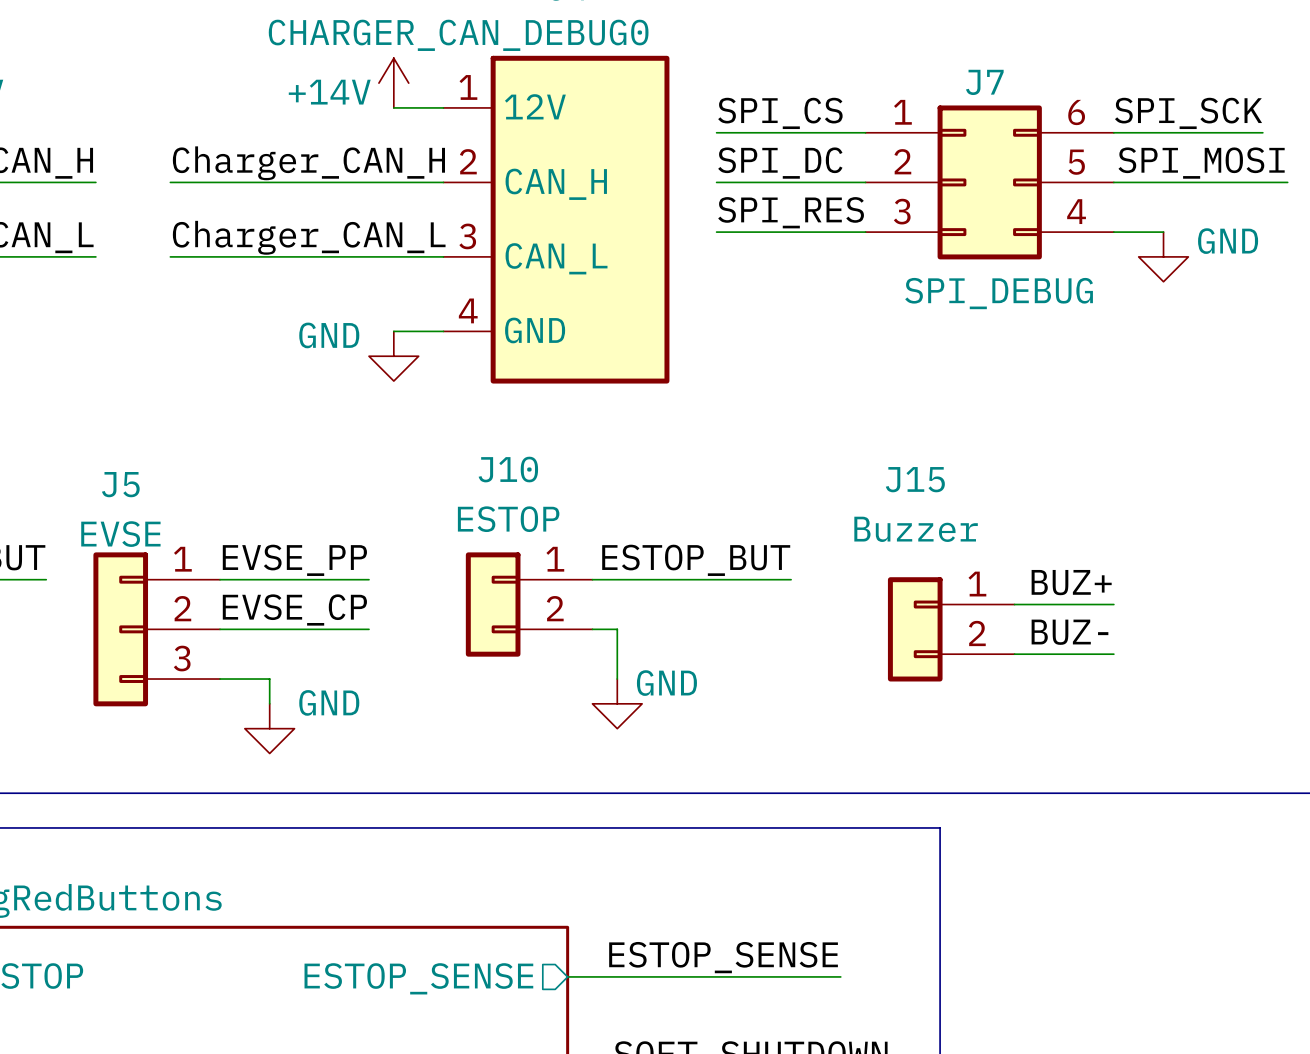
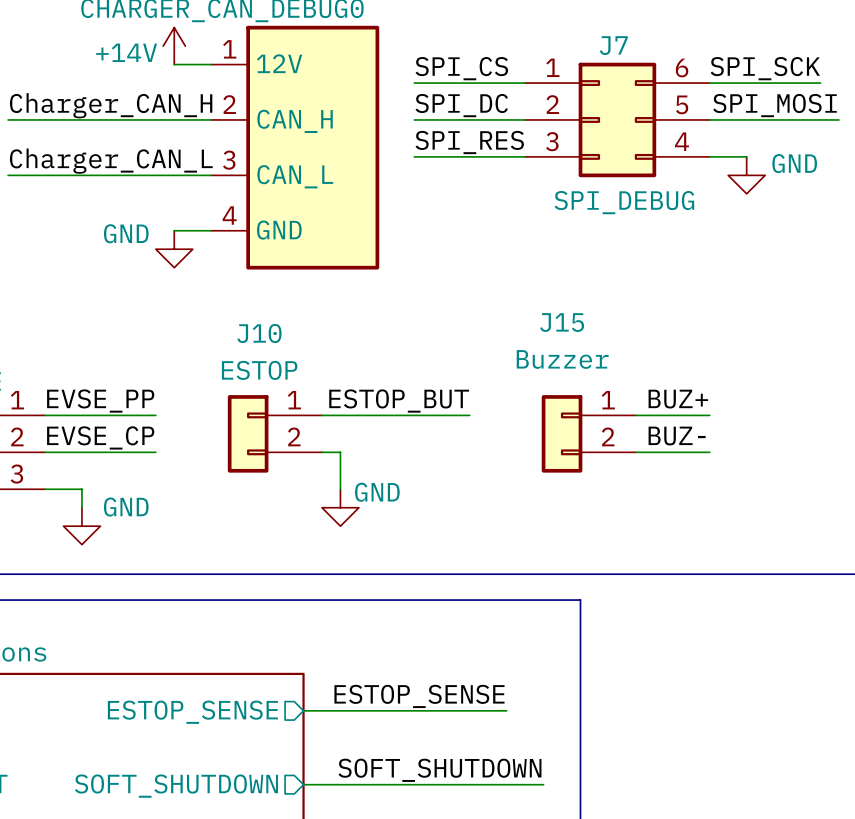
label position: BUZ+ (1071, 582) -> BUZ+ (678, 399)
wire: (1014, 604) (1113, 604) -> (635, 415) (709, 415)
J15 position: (951, 629) -> (588, 433)
label position: BUZ- (1069, 632) -> BUZ- (677, 436)
wire: (1014, 654) (1113, 654) -> (635, 452) (709, 452)

